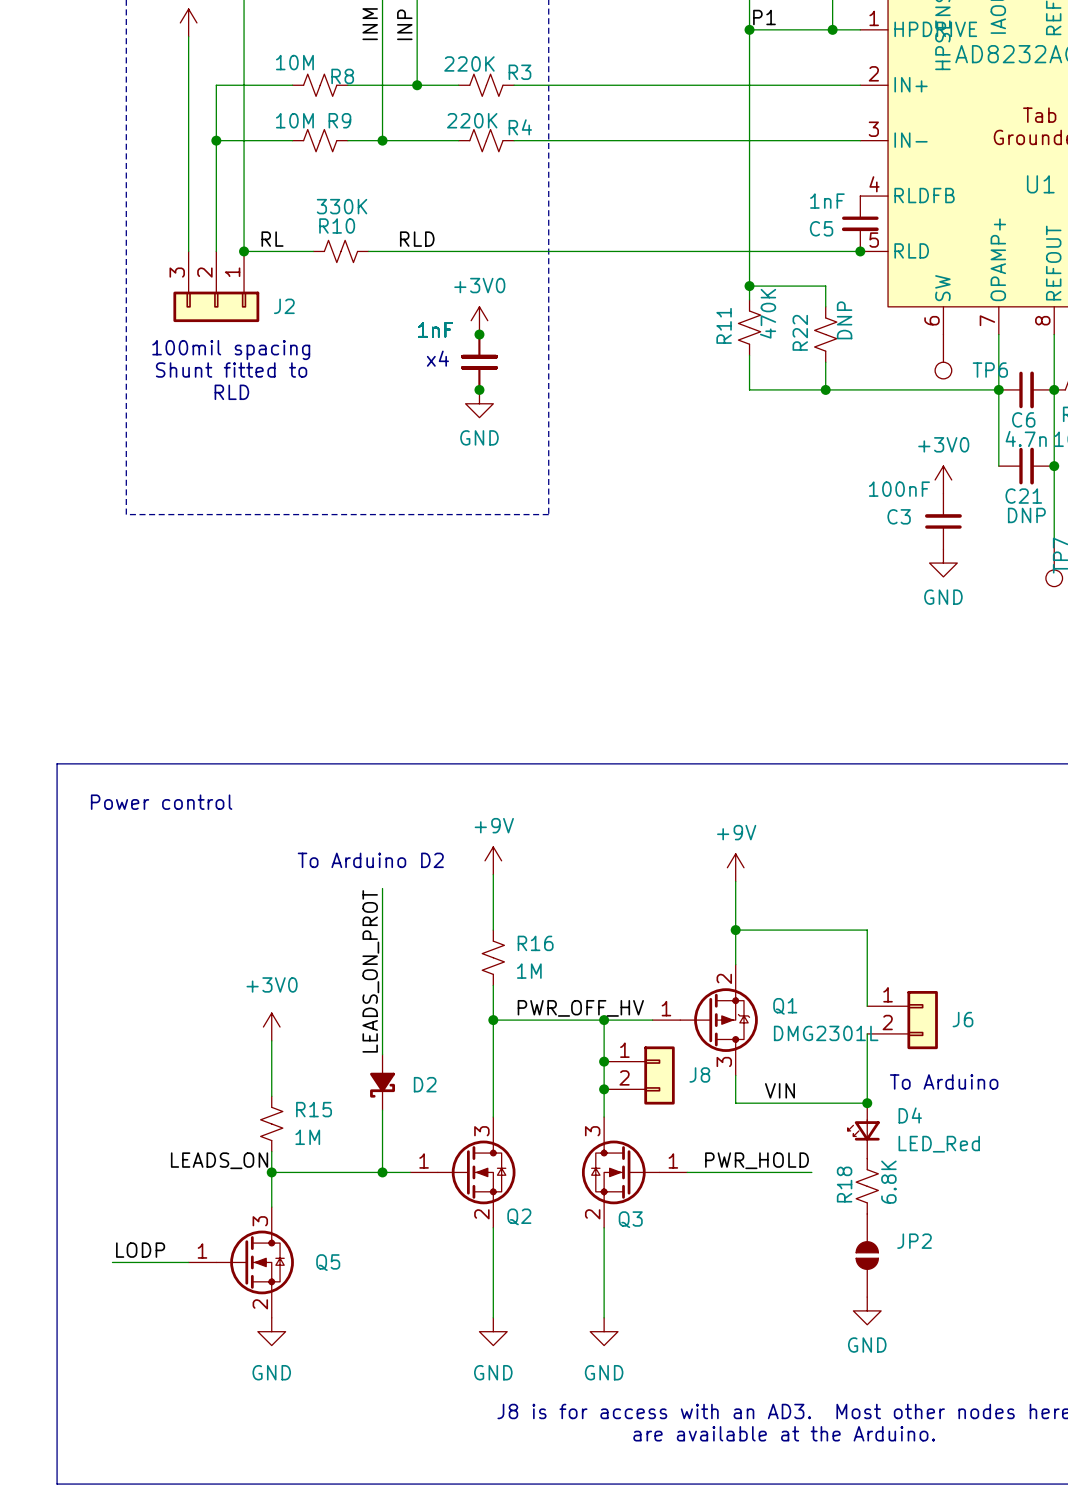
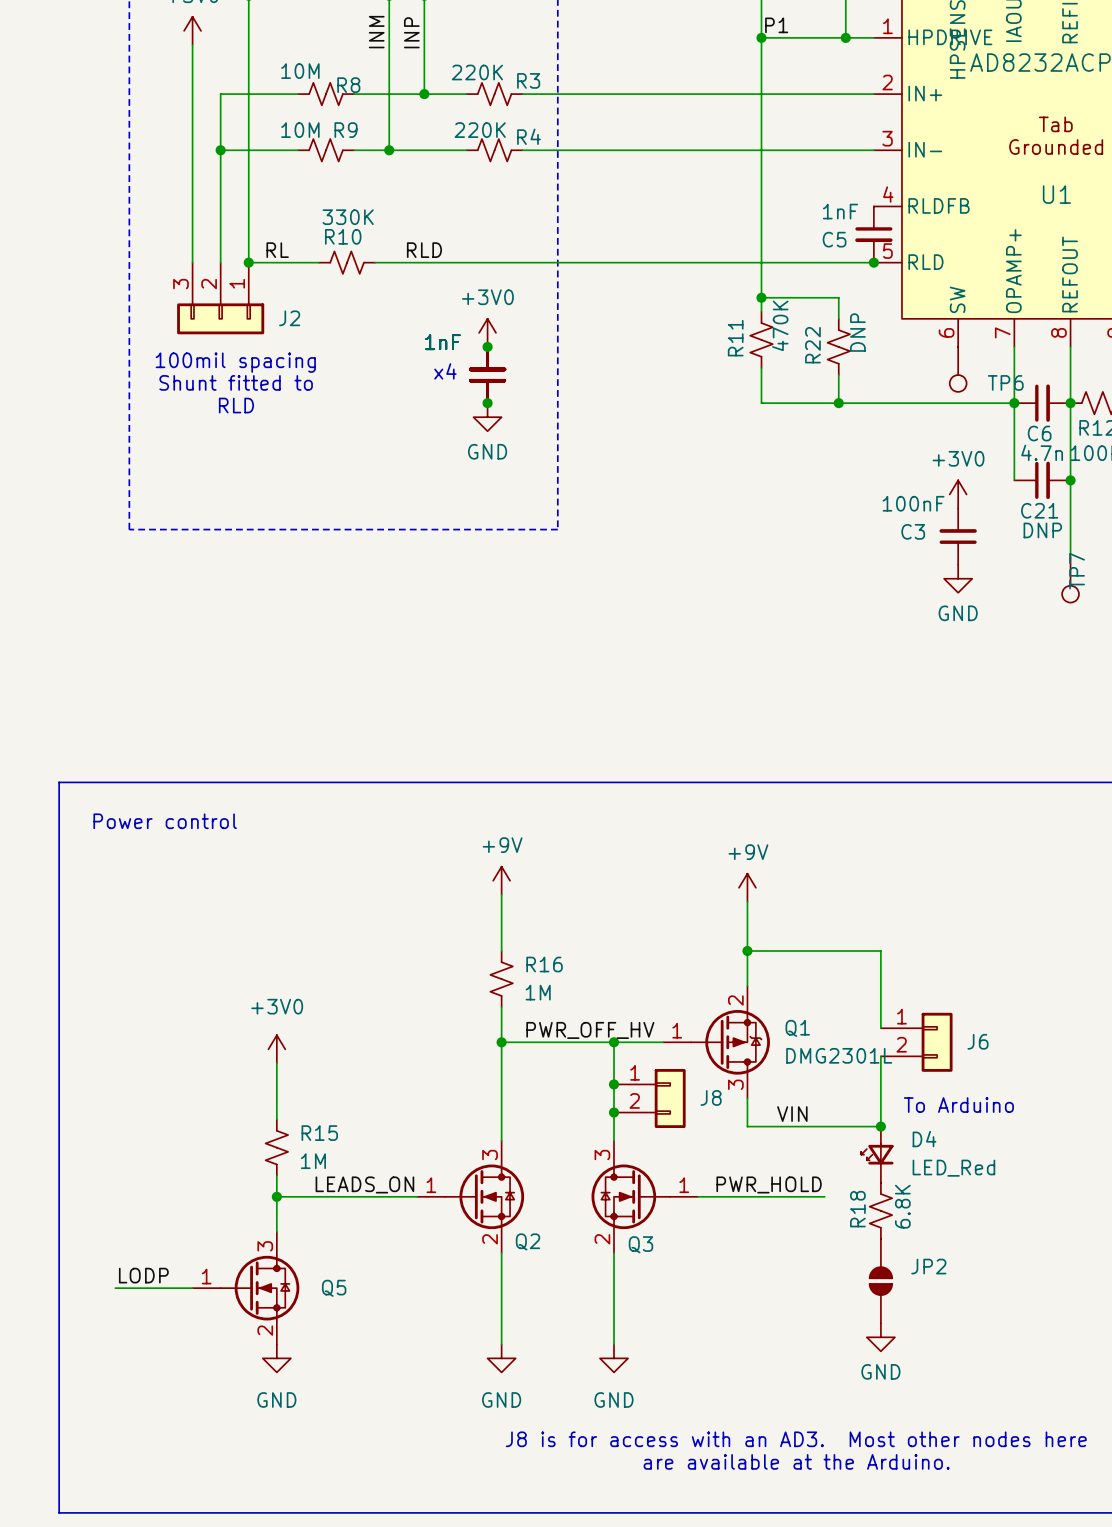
text: To Arduino D2 (370, 860) -> none
wire: (382, 888) (382, 1054) -> none
label: LEADS_ON_PROT (370, 971) -> none
D2: (382, 1082) -> none
wire: (382, 1110) (382, 1172) -> none
label position: LEADS_ON (219, 1160) -> LEADS_ON (364, 1184)
junction: (382, 1172) -> none

